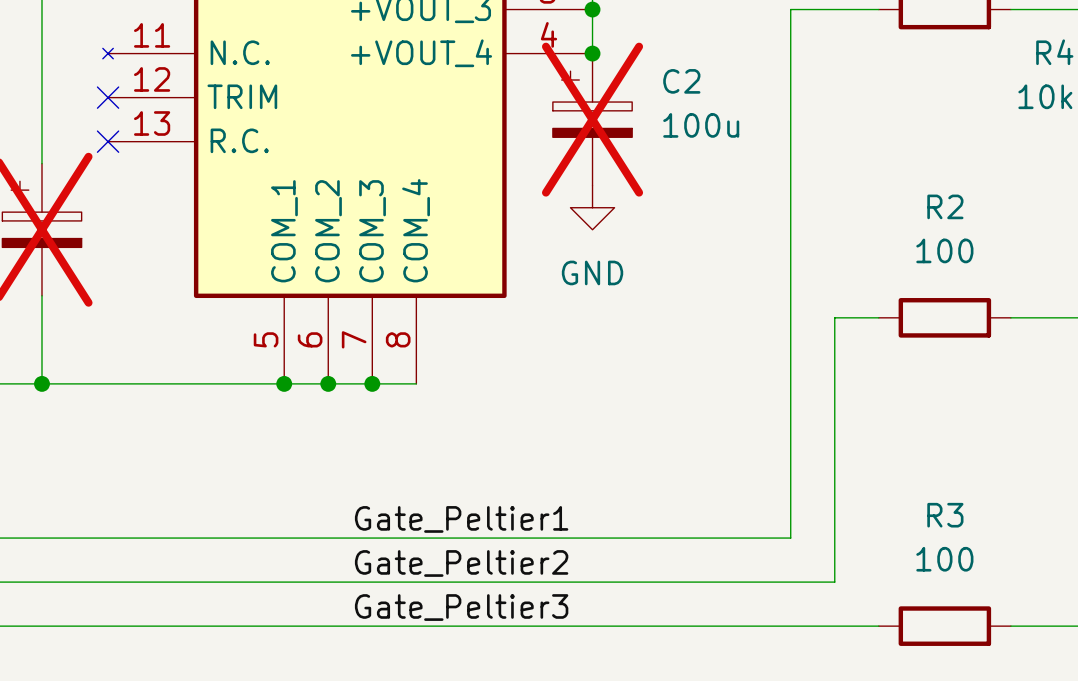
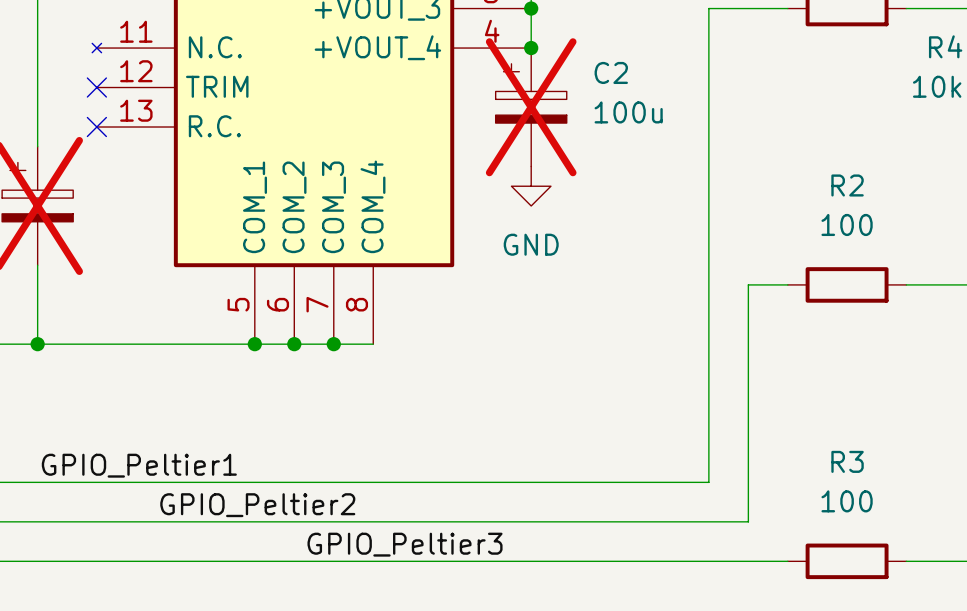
label: none -> GPIO_Peltier1 (139, 465)
label: Gate_Peltier1 (461, 519) -> none
label: none -> GPIO_Peltier2 (257, 505)
label: Gate_Peltier2 (461, 563) -> none
label: Gate_Peltier3 (461, 607) -> GPIO_Peltier3 (405, 544)

